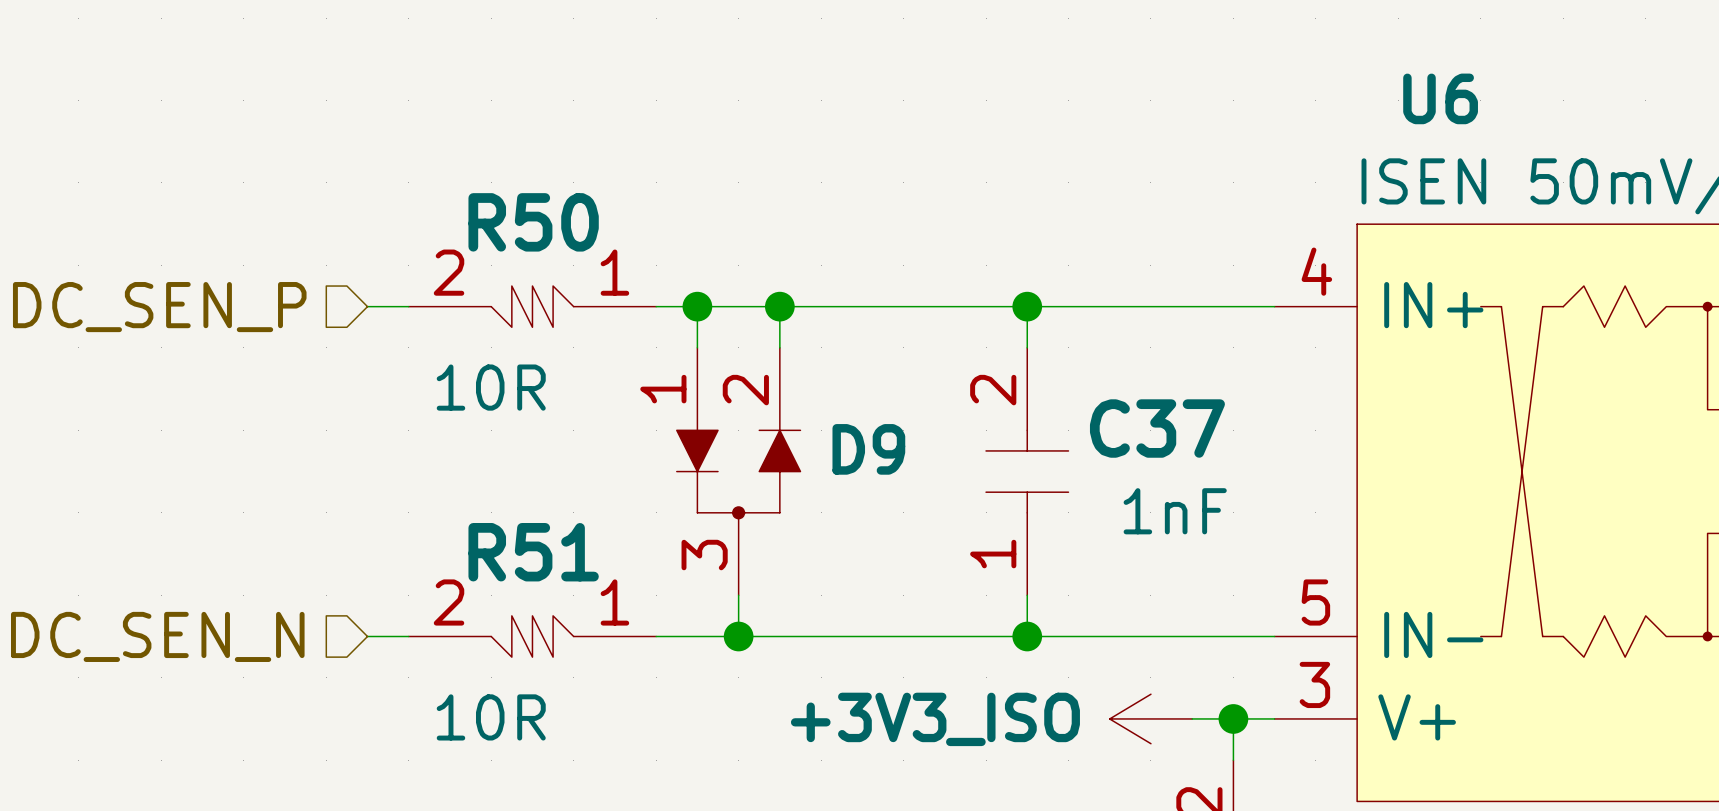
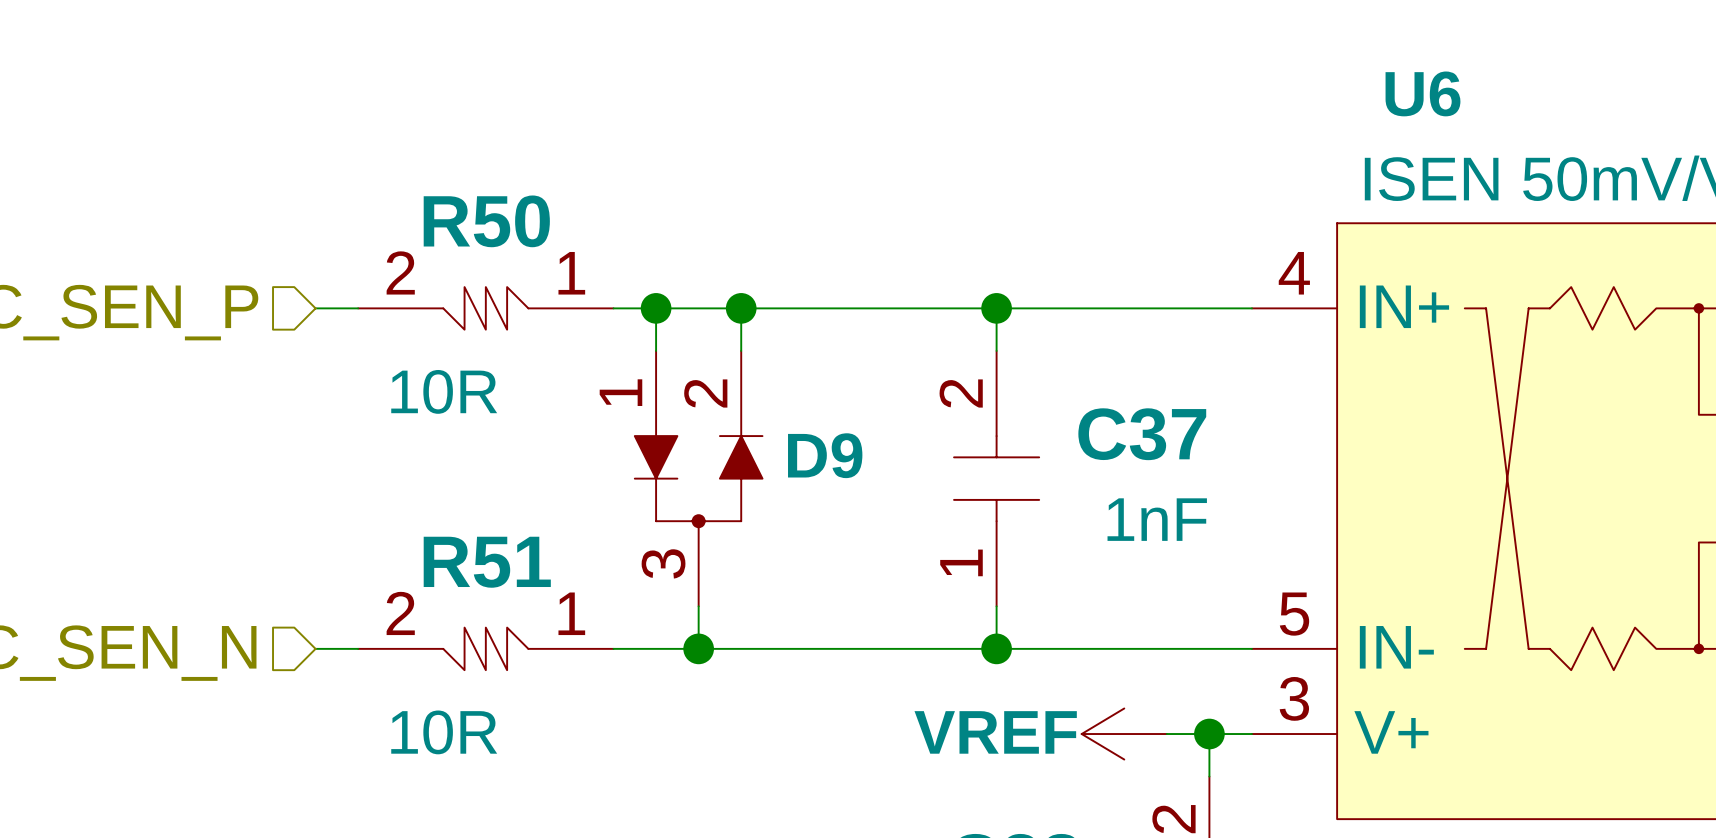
power symbol: +3V3_ISO (1150, 718) -> VREF (1124, 734)

